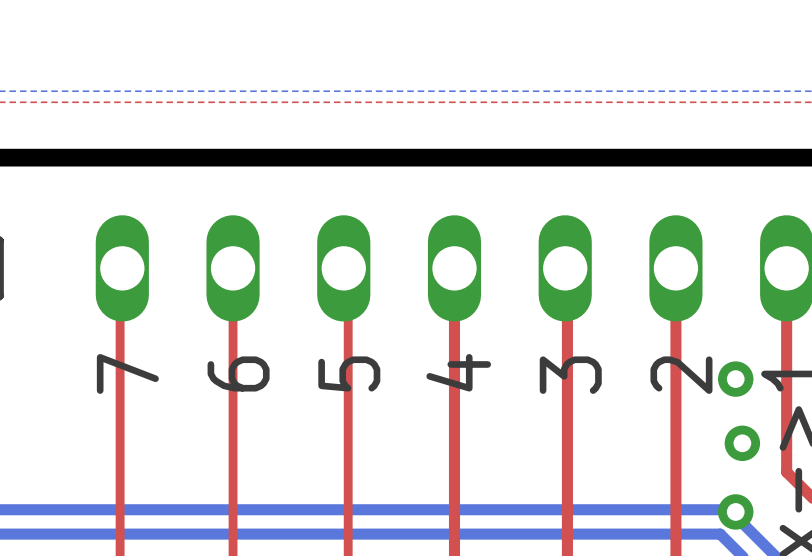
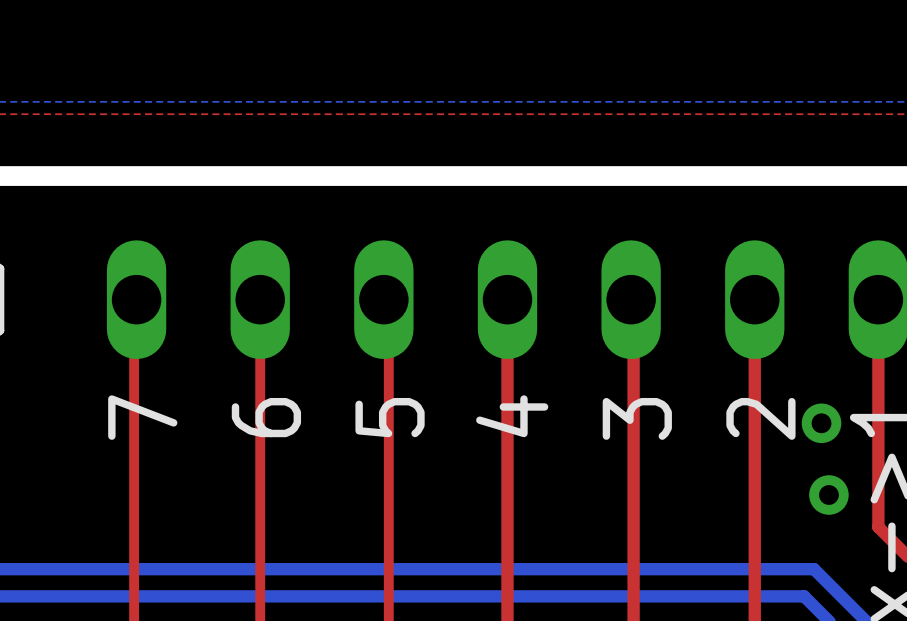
via: (735, 511) -> none

